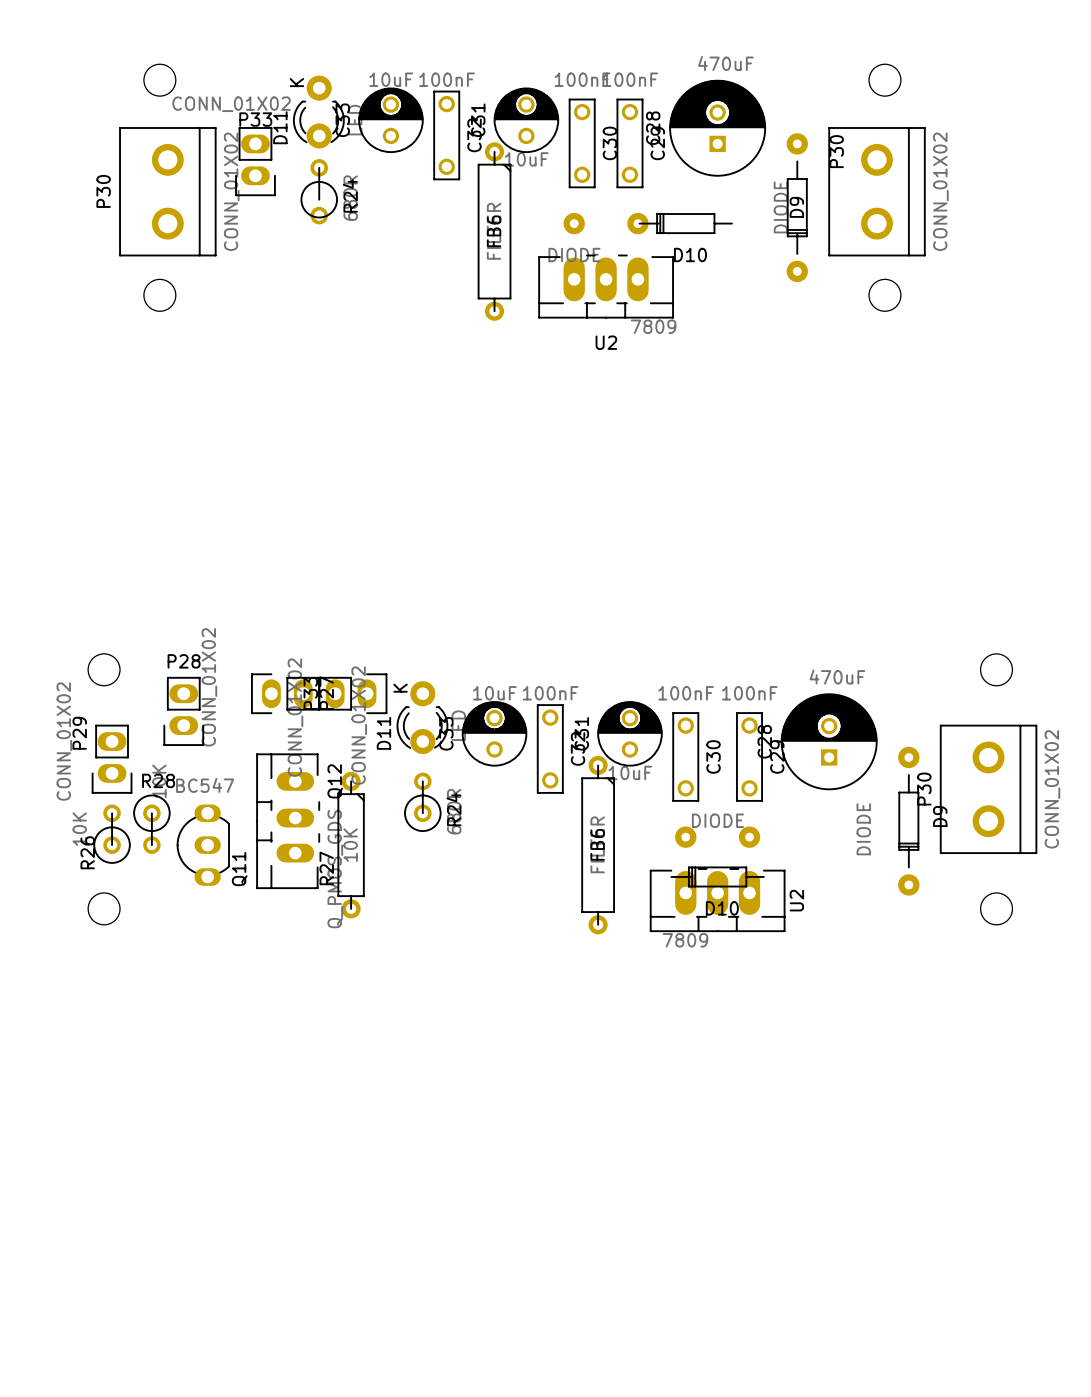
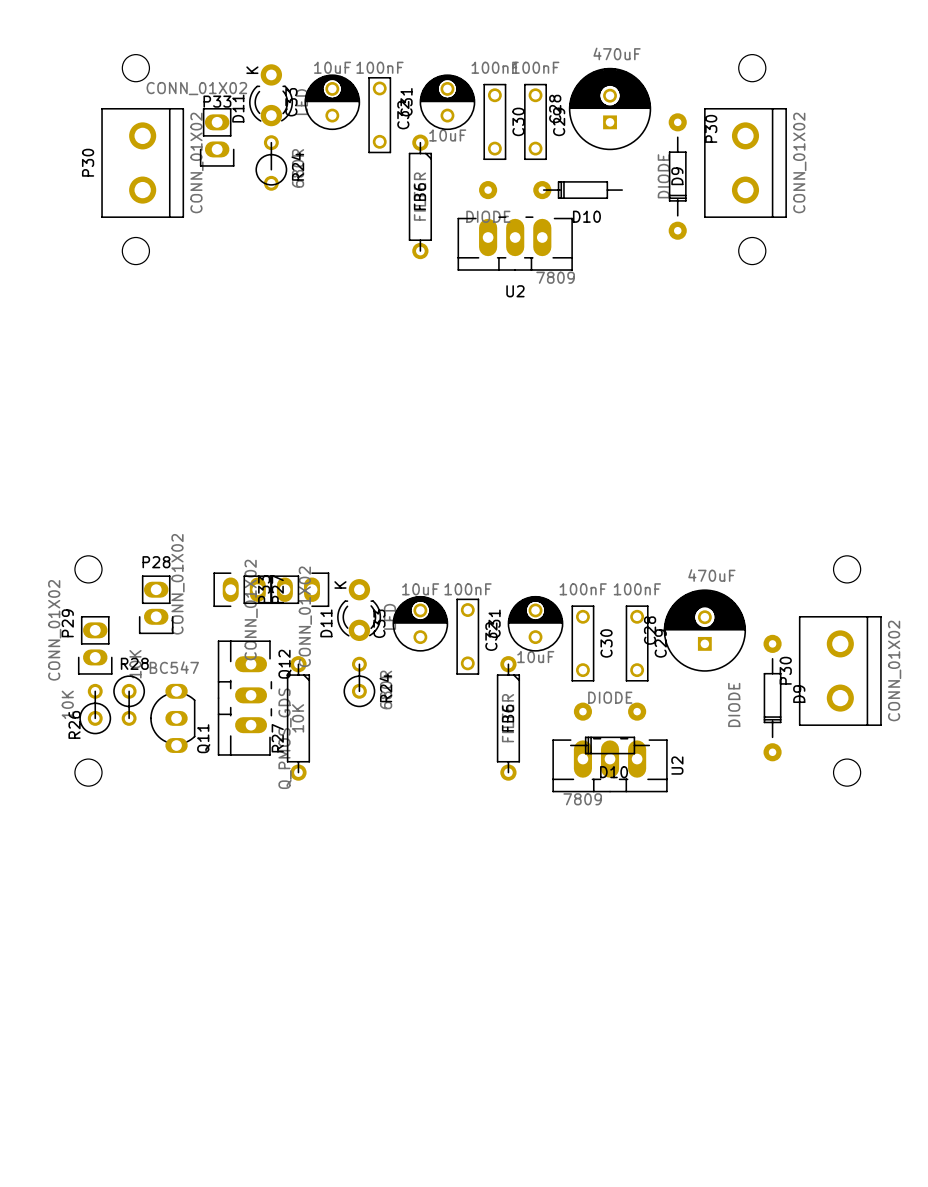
FB6 footprint: [477, 142, 512, 321] -> [408, 134, 433, 260]
FB6 footprint: [581, 755, 615, 935] -> [496, 656, 521, 781]

